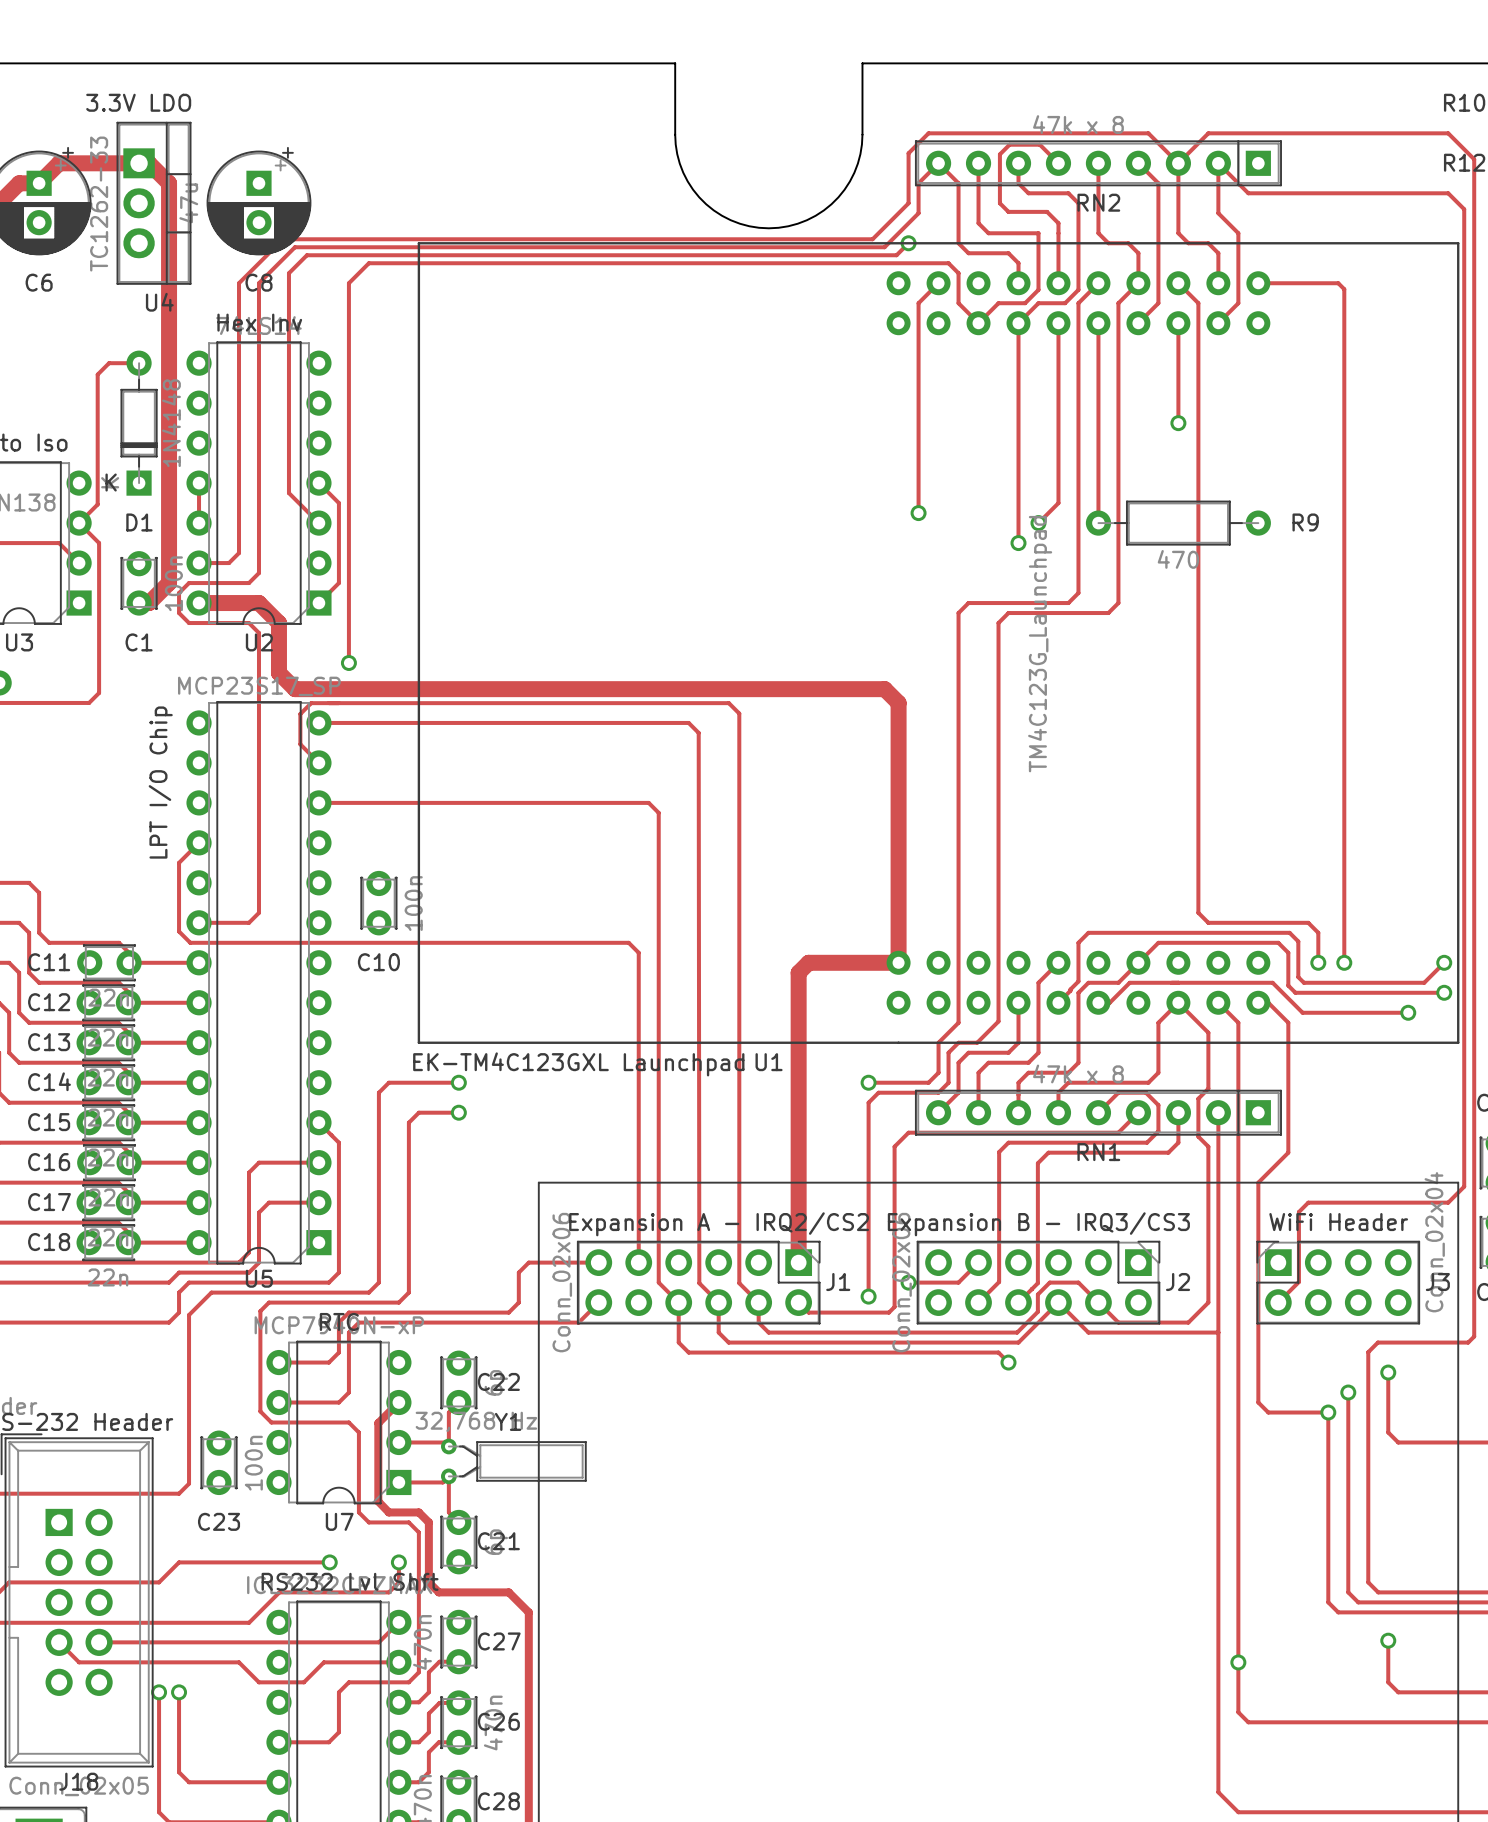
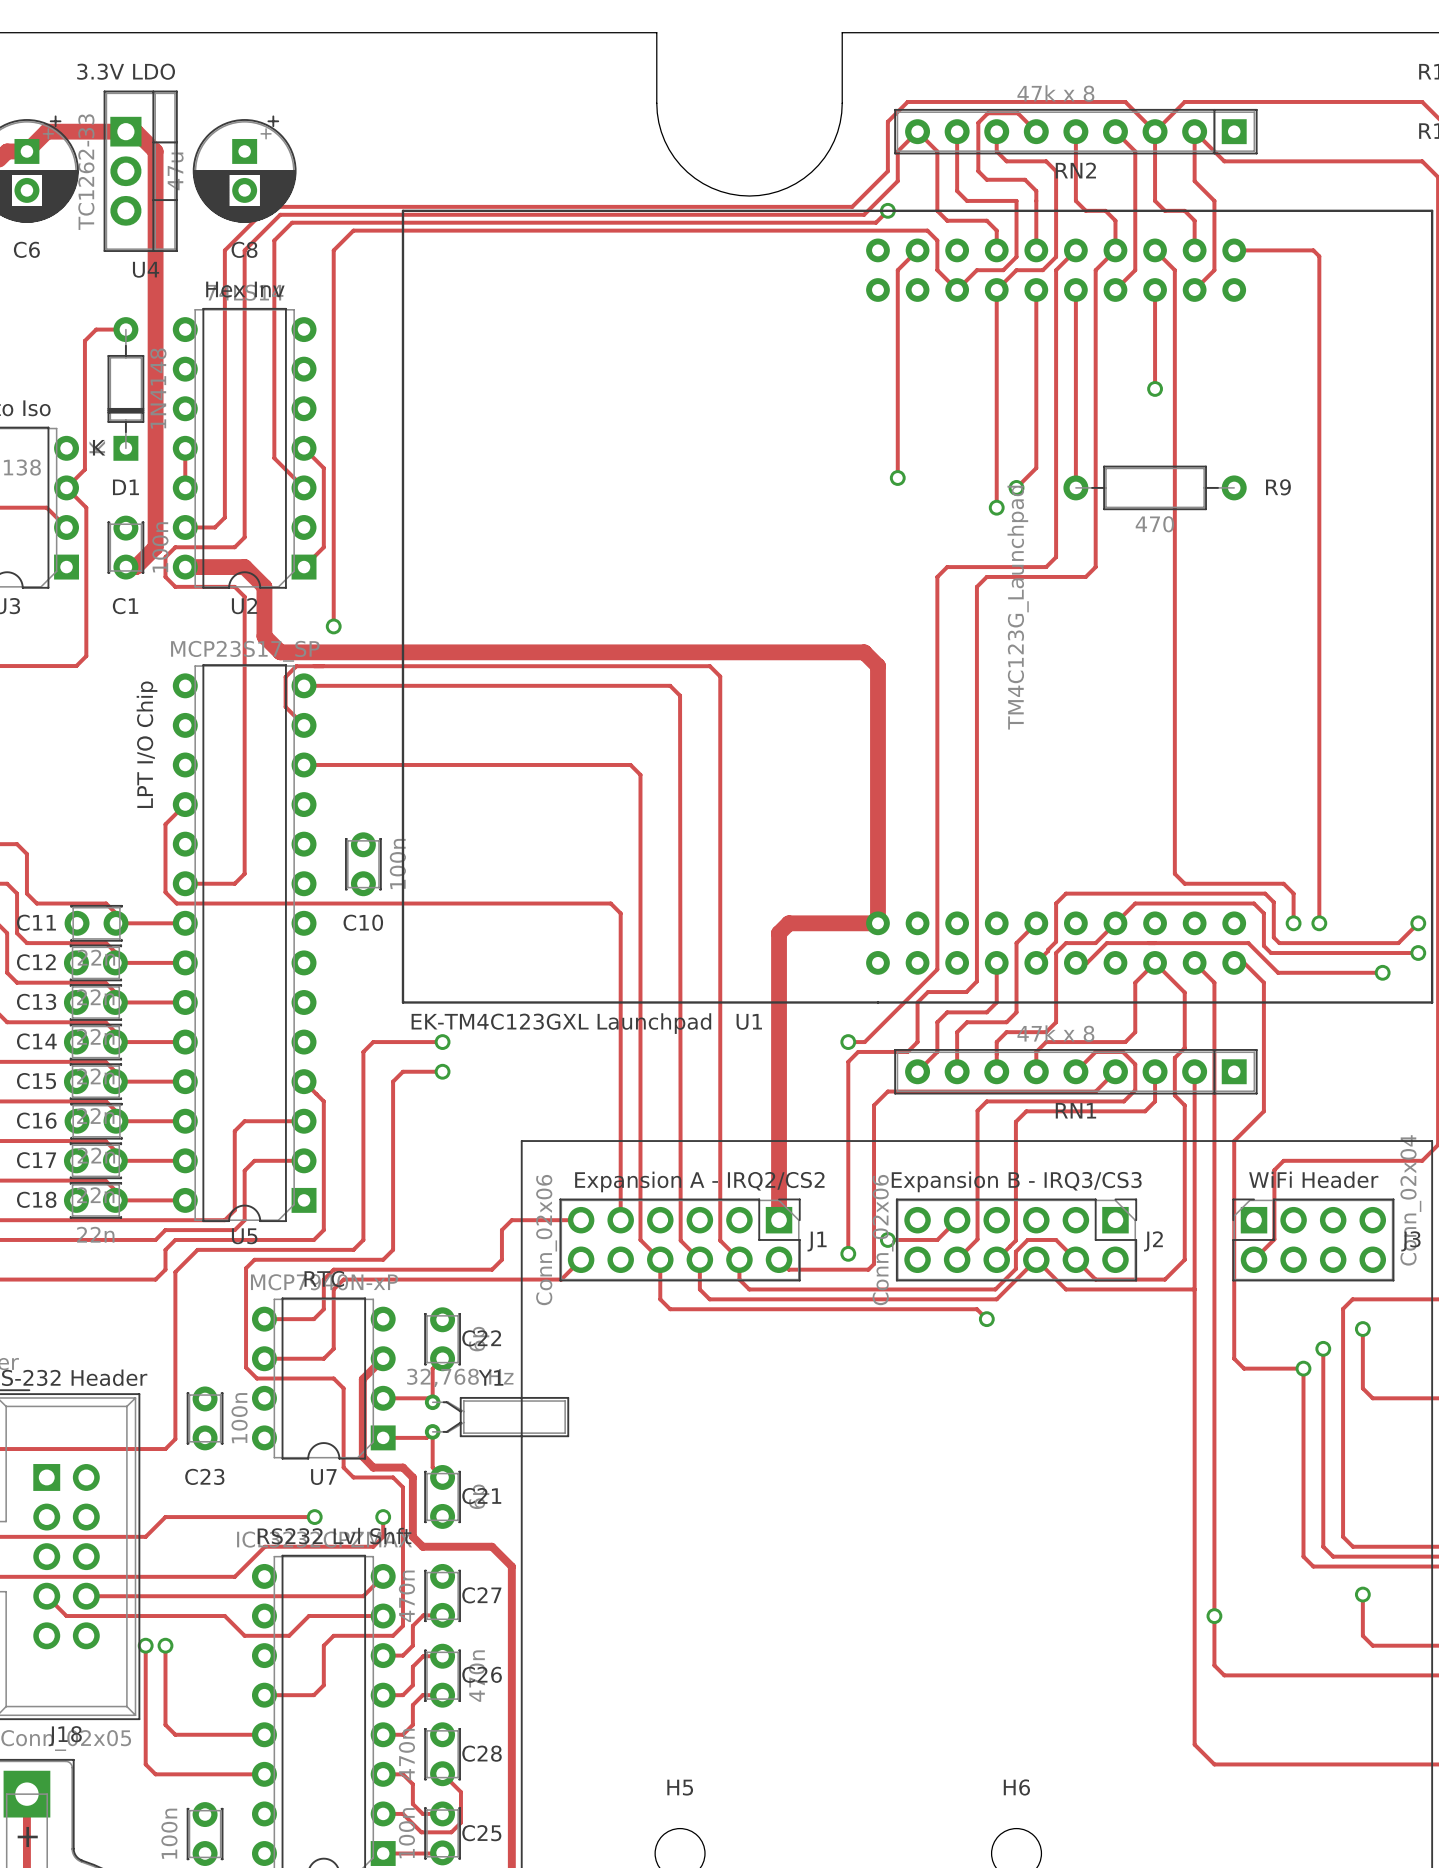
track: (958, 1009) (958, 1022) (949, 1032) -> (976, 981) (966, 992) (928, 992)
track: none -> (937, 969) (864, 1042)
track: (998, 1021) (977, 1042) (958, 1042) (948, 1052) (948, 1082) (938, 1092) (928, 1092) -> none
track: (938, 1072) (928, 1082) (885, 1082) -> (917, 1032) (917, 1042) (907, 1051)

